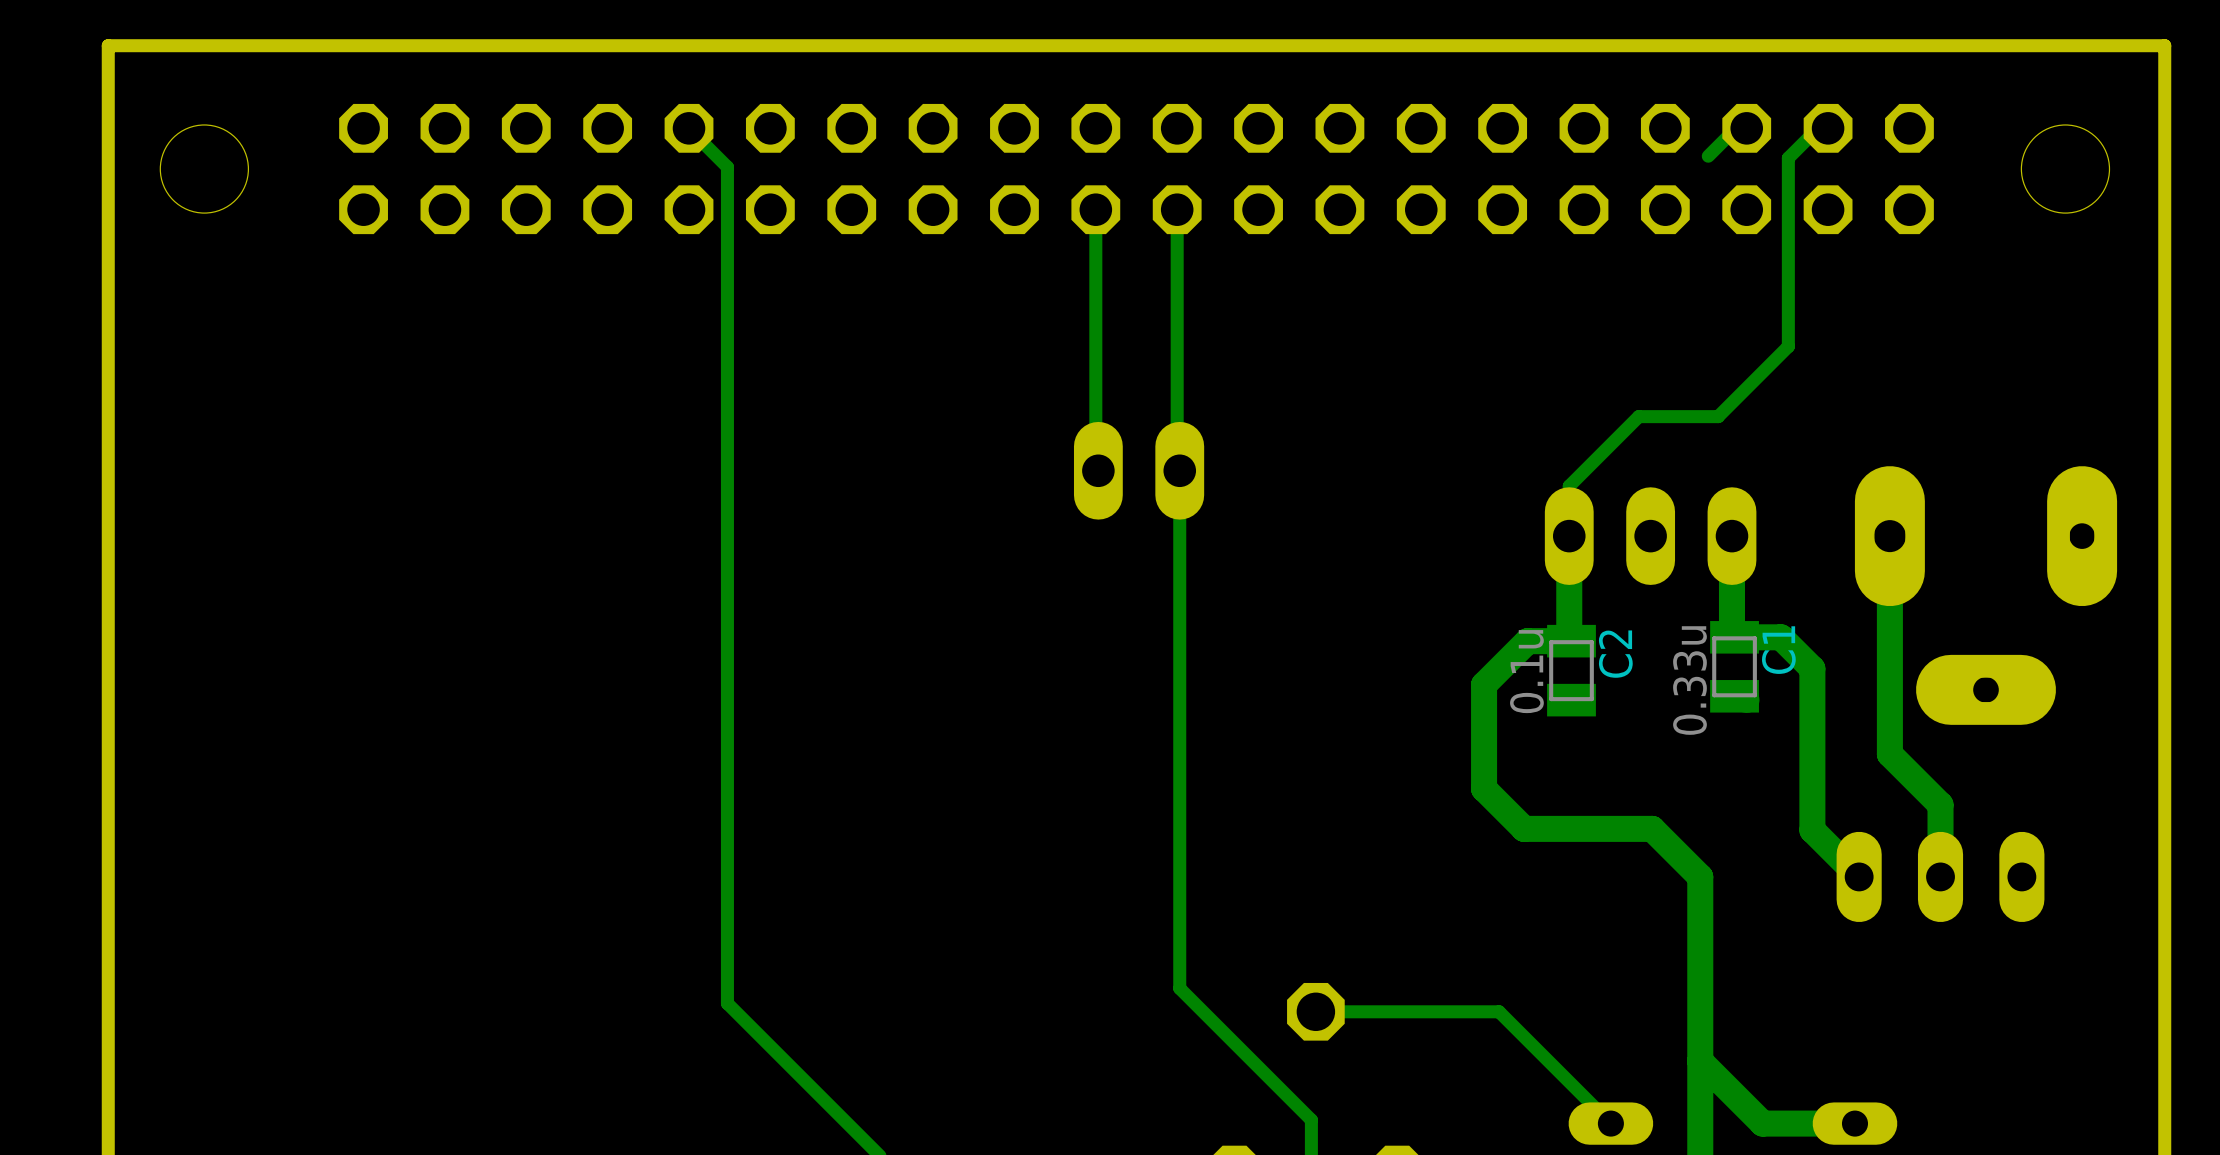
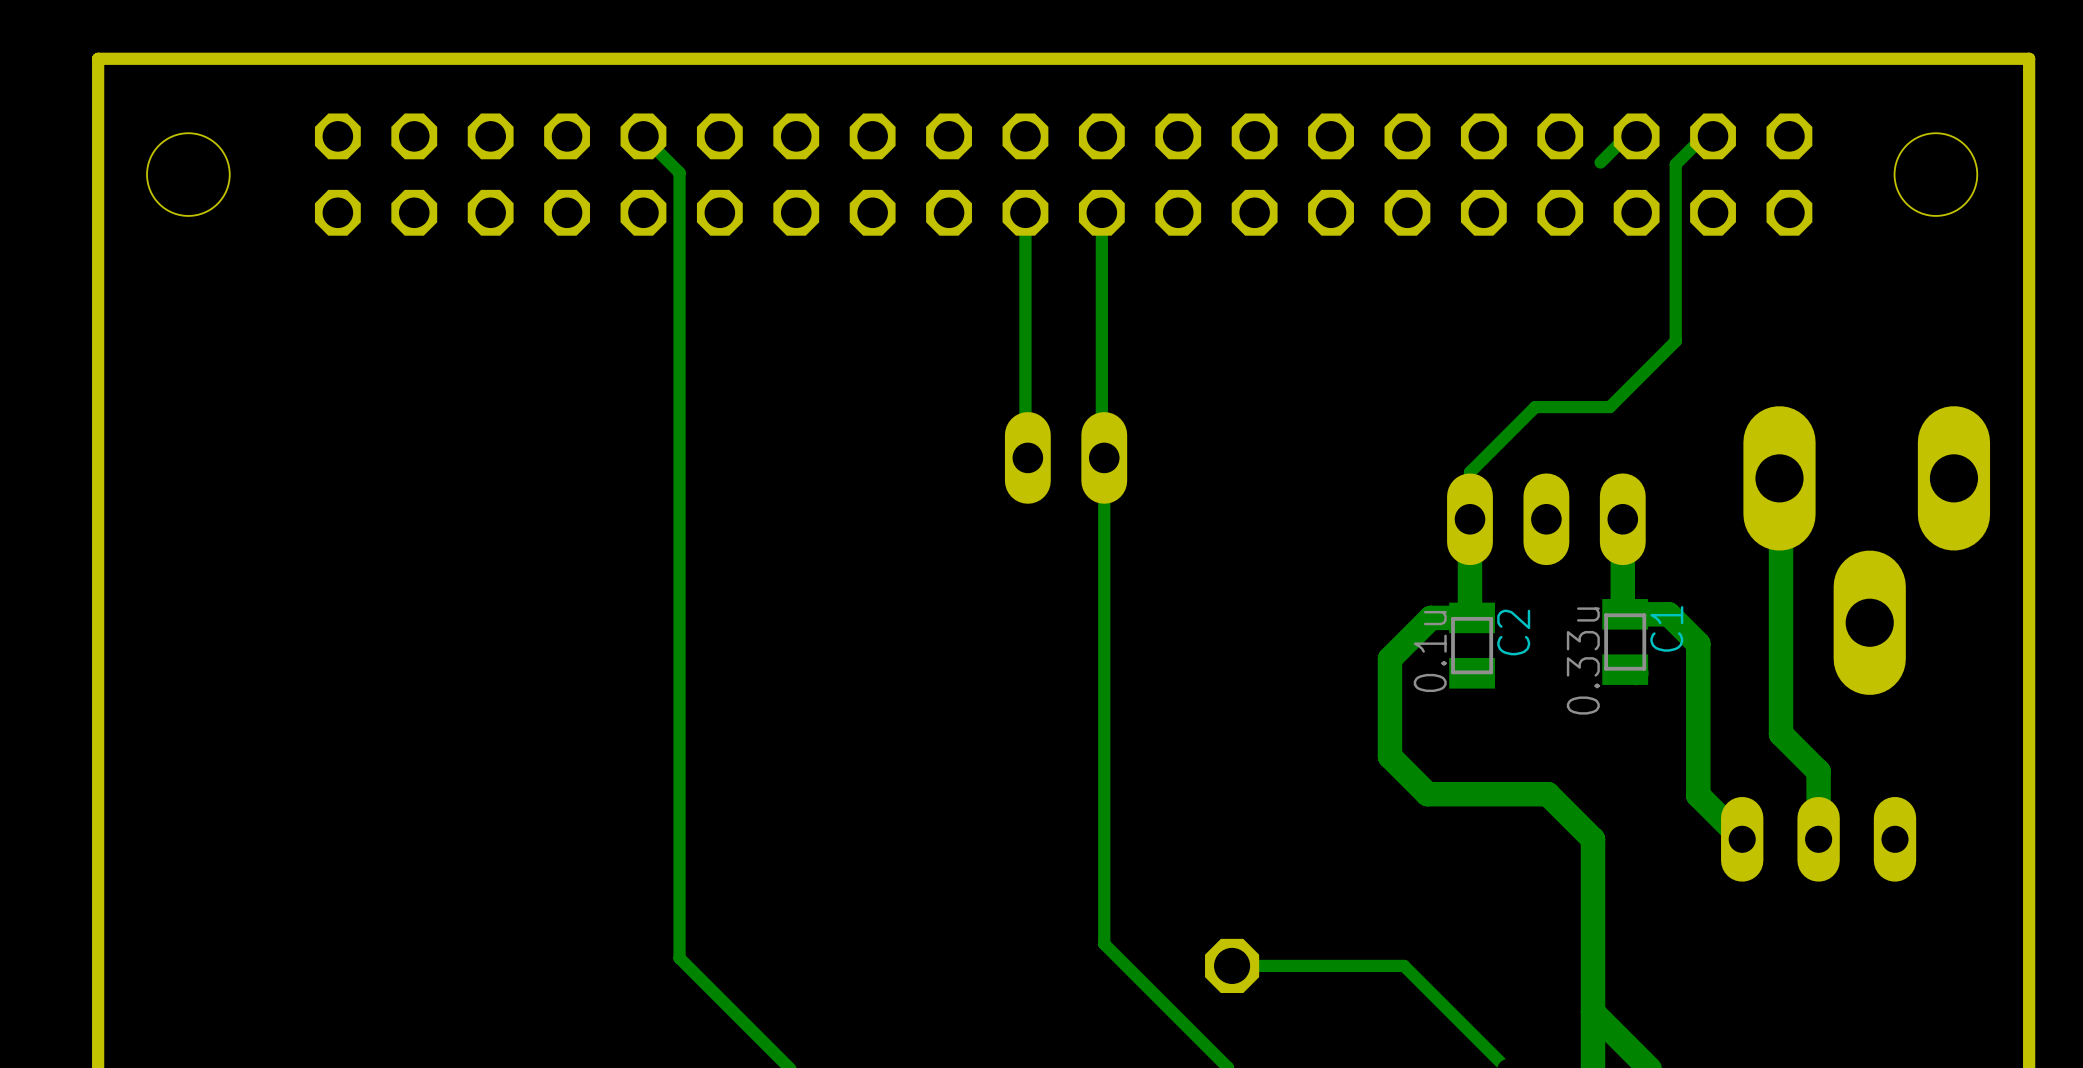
part footprint: [1854, 466, 2118, 725] -> [1743, 406, 1991, 695]
track: (1889, 536) (1889, 754) (1900, 764) -> (1779, 478) (1781, 478) (1781, 734)

